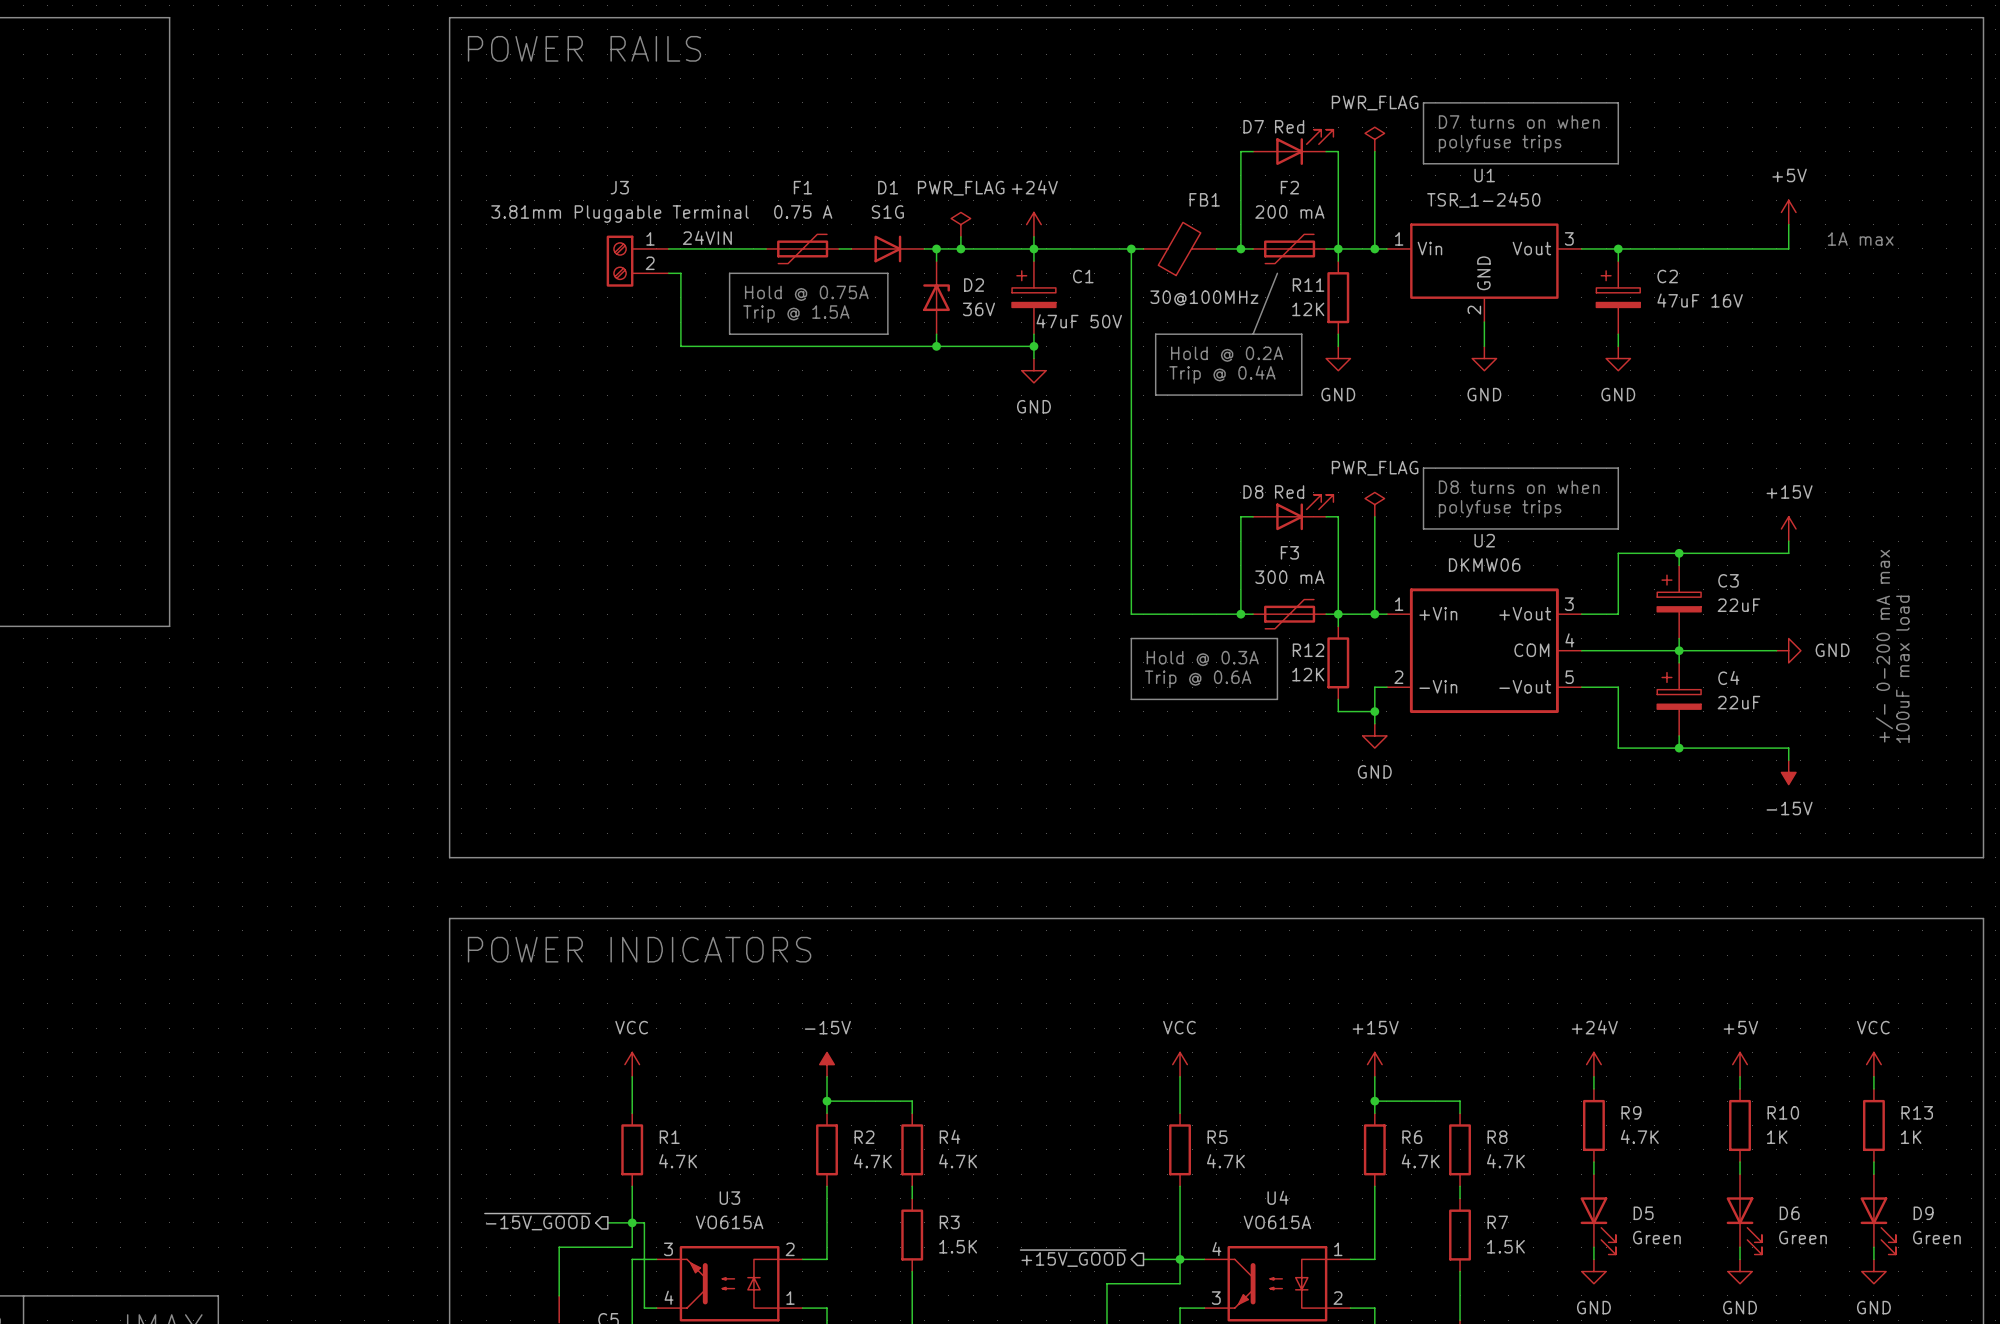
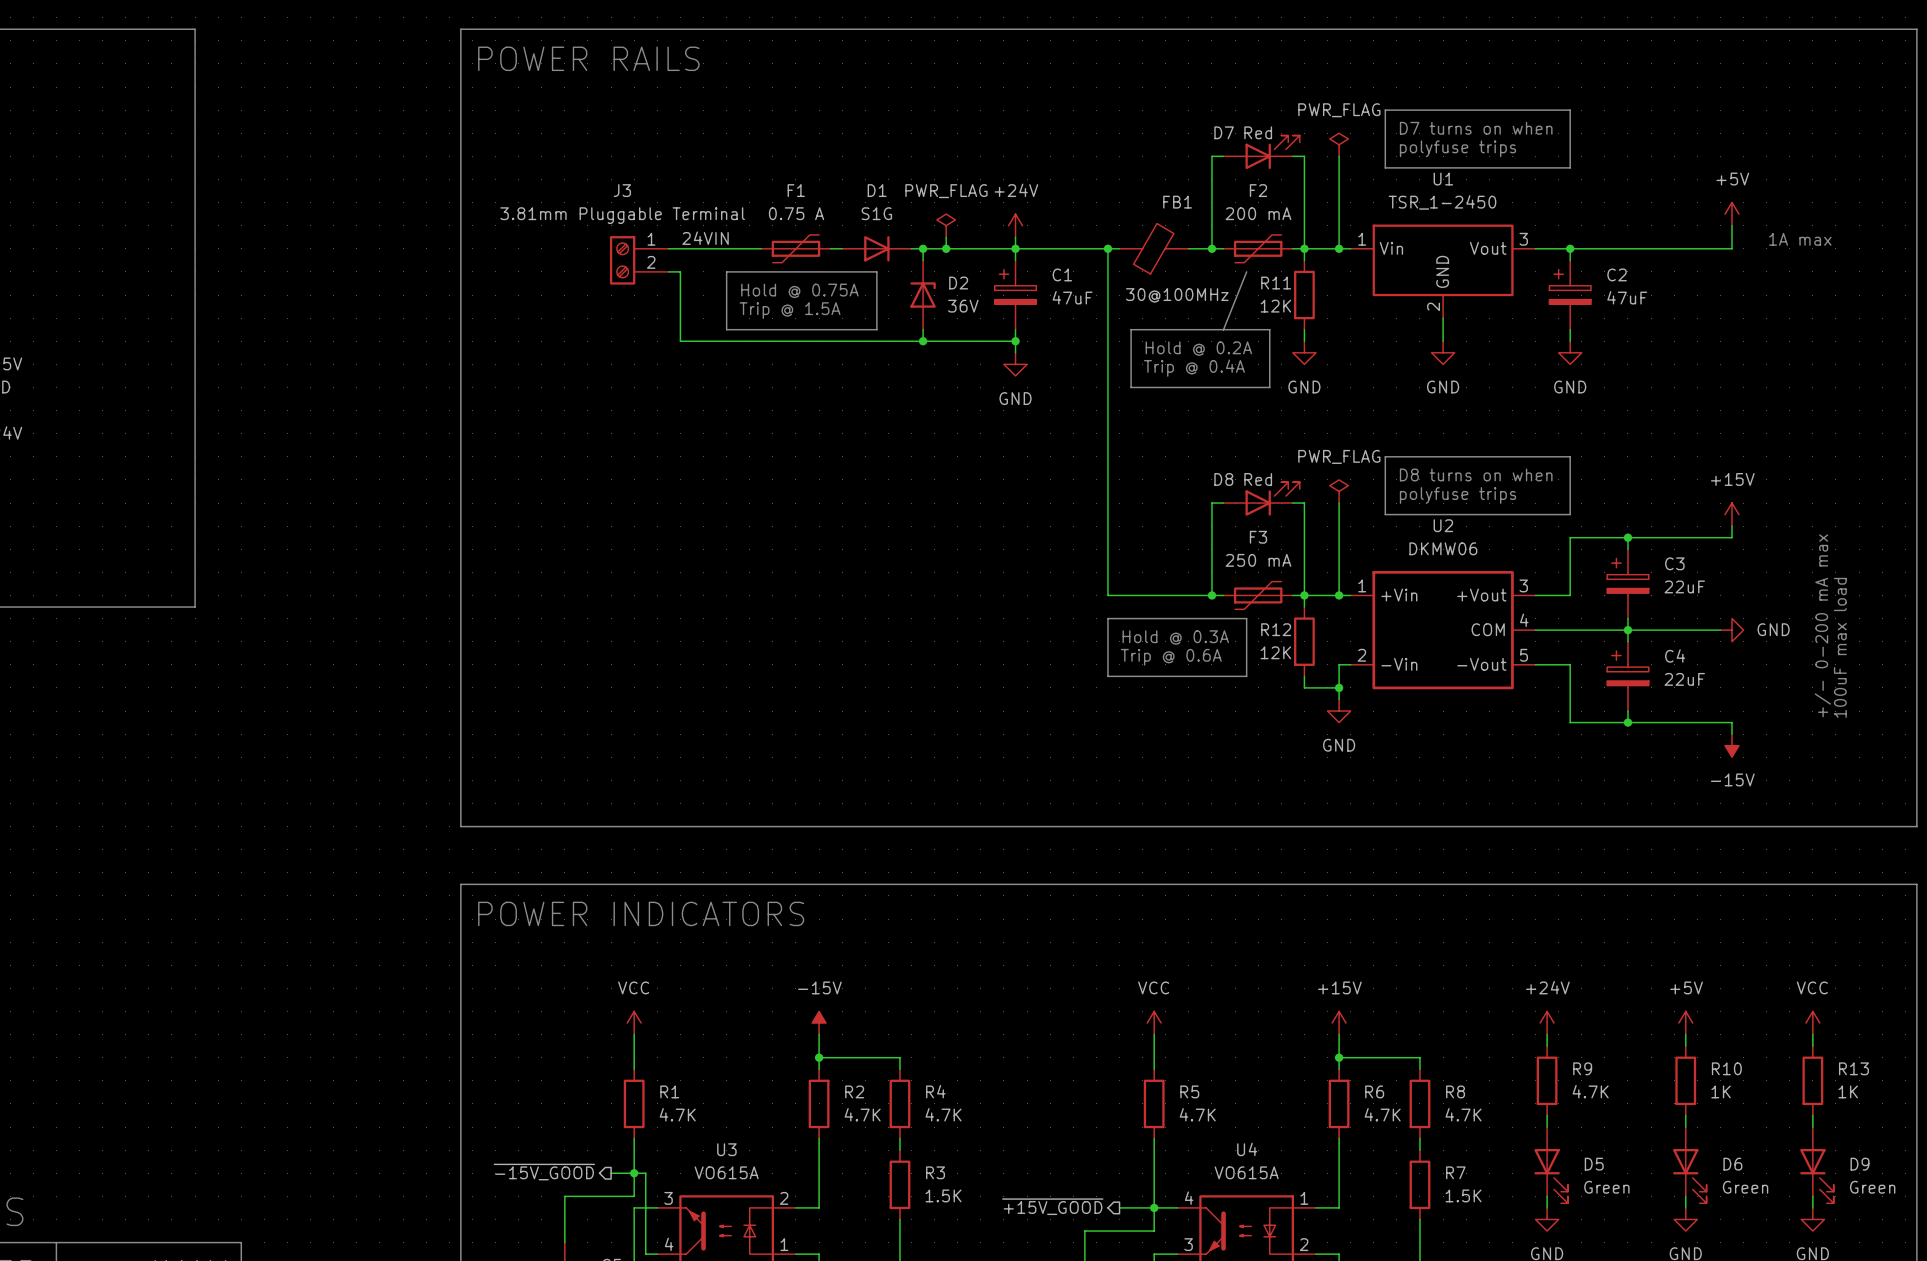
C2 value: 47uF 16V (1700, 300) -> 47uF (1627, 297)
C1 value: 47uF 50V (1079, 321) -> 47uF (1072, 297)
F3 value: 300 mA (1289, 577) -> 250 mA (1258, 560)

